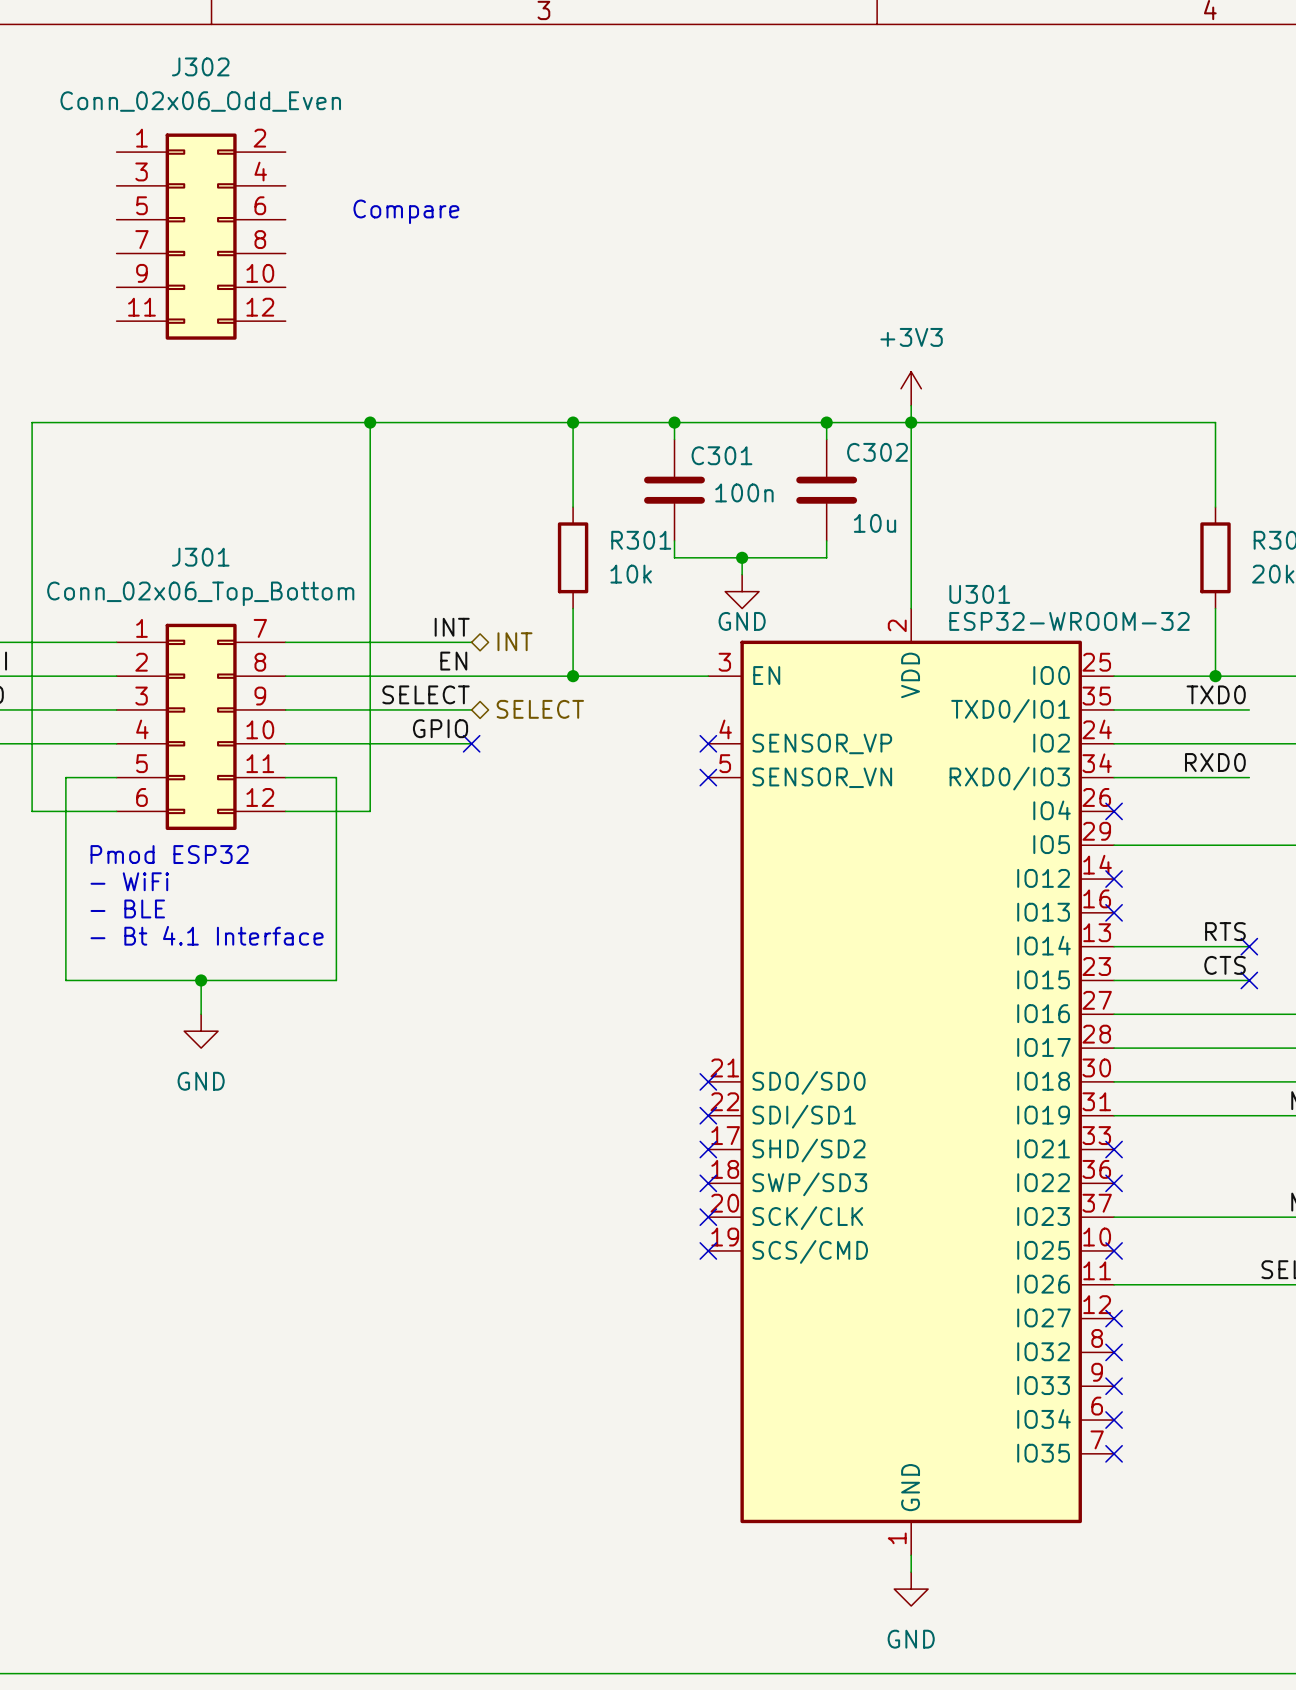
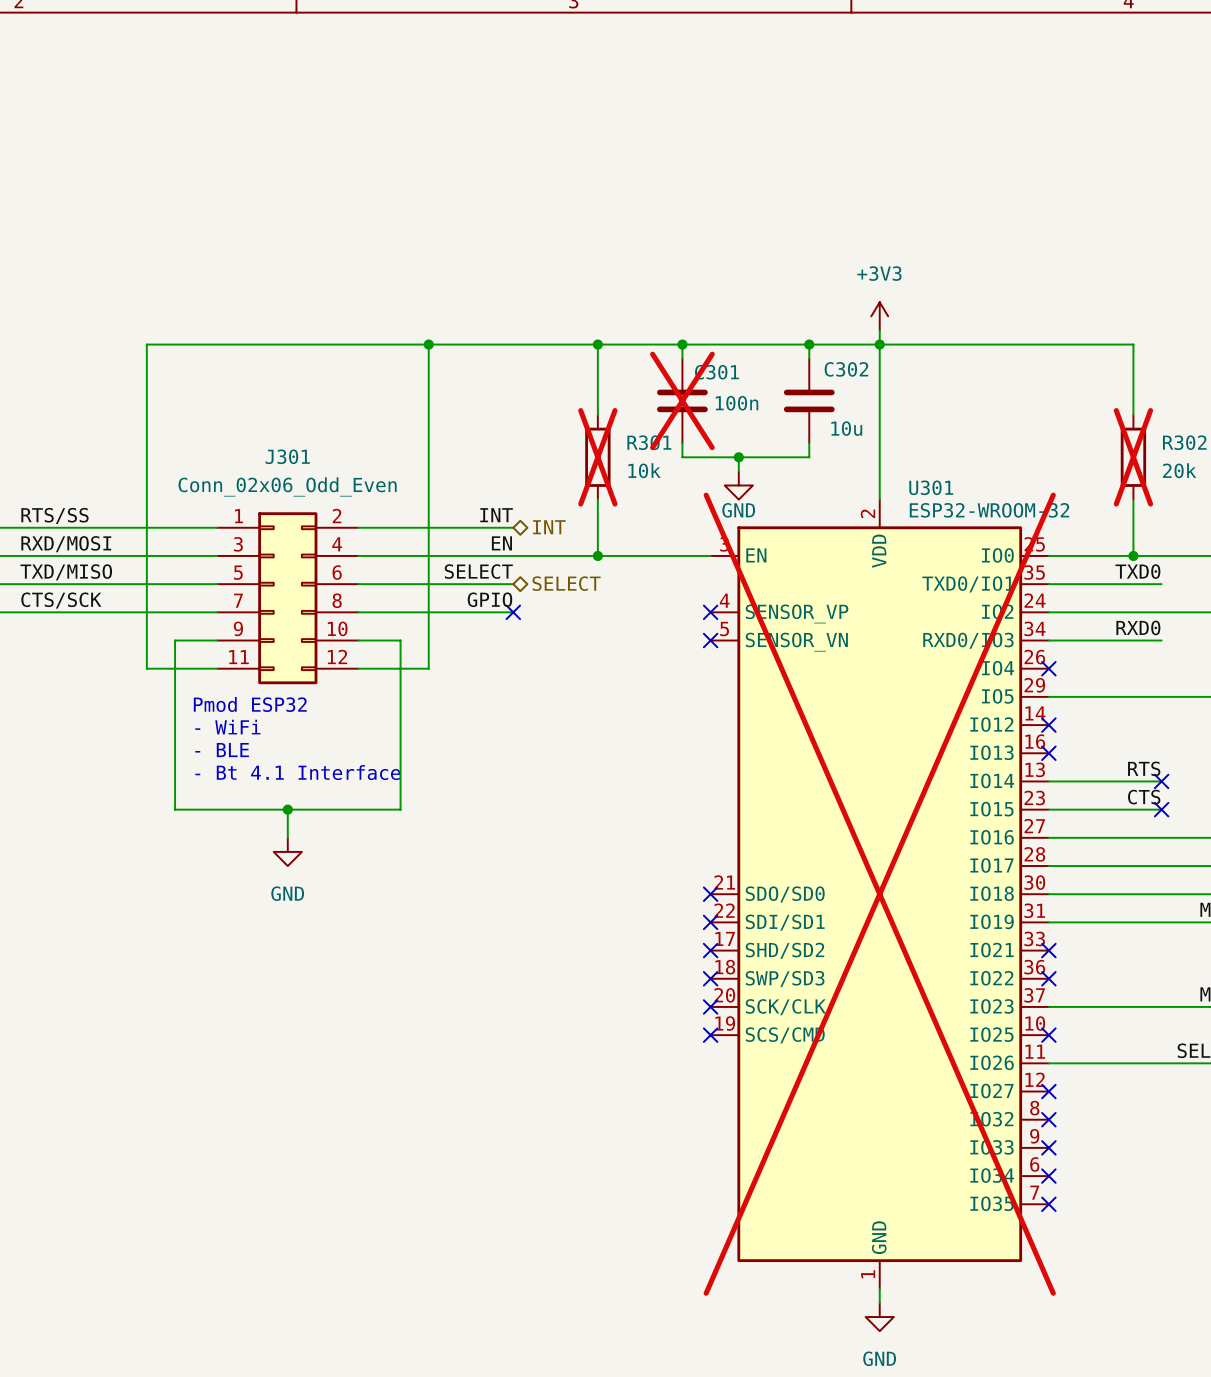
text: Compare (406, 211) -> none
J302: Conn_02x06_Odd_Even (201, 236) -> none
C301 do-not-place cross: none -> (682, 400)
R301 do-not-place cross: none -> (597, 457)
R302 do-not-place cross: none -> (1133, 457)
J301 value: Conn_02x06_Top_Bottom (200, 593) -> Conn_02x06_Odd_Even (287, 486)
J301 symbol: [116, 623, 286, 831] -> [217, 512, 359, 685]
U301 do-not-place cross: none -> (879, 894)

